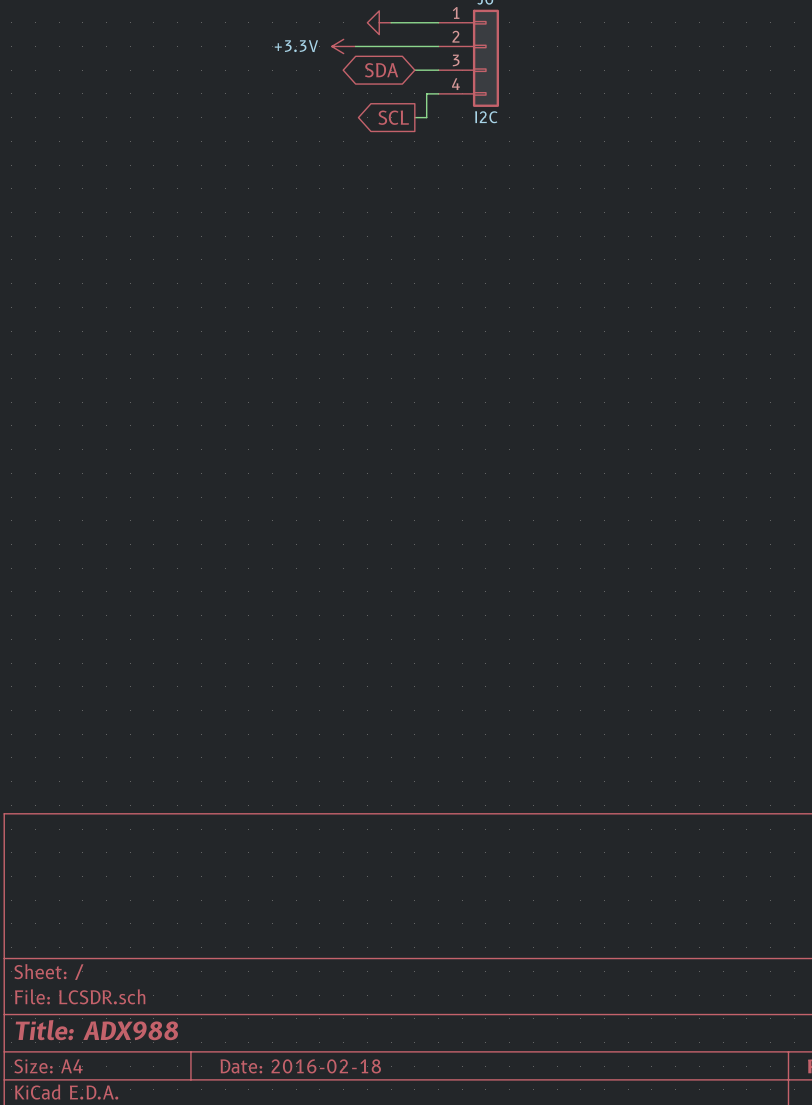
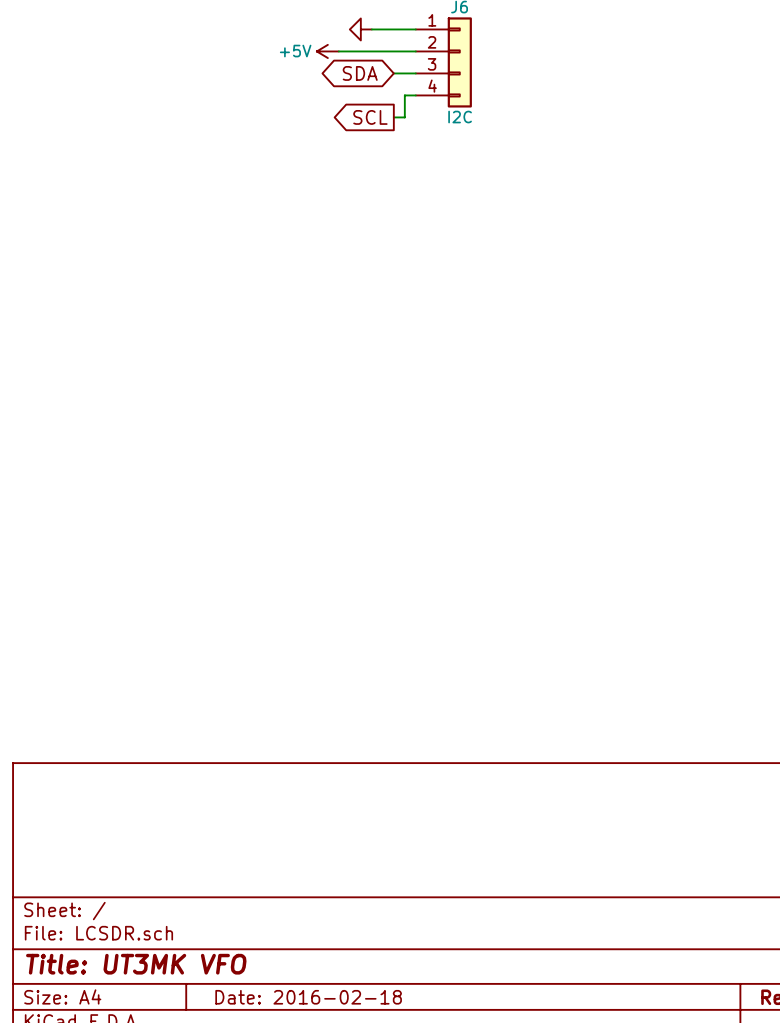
power symbol: +3.3V (343, 46) -> +5V (327, 51)
title block: Title: ADX988 (96, 1030) -> Title: UT3MK VFO (136, 964)

